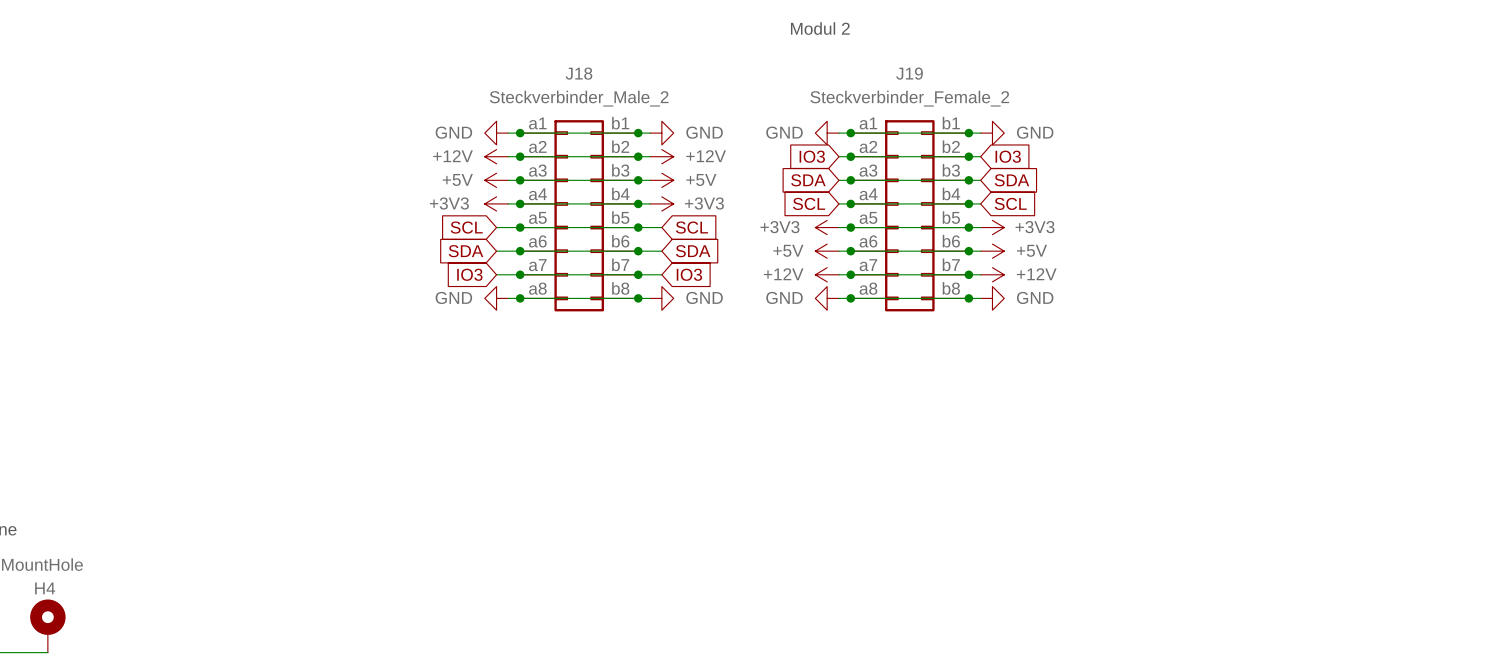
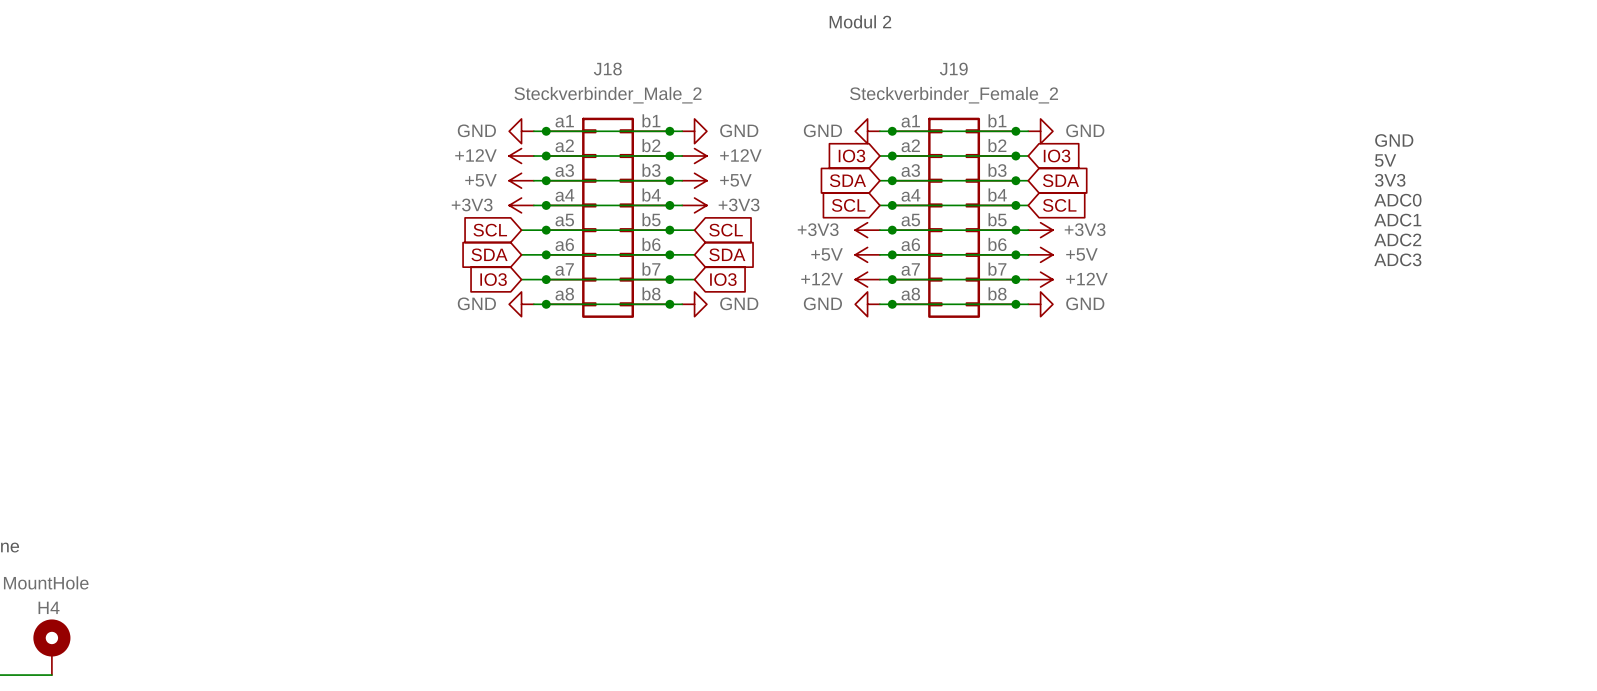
text: none -> GND (1394, 140)
text: none -> 5V (1385, 160)
text: none -> 3V3 (1390, 180)
text: none -> ADC0 (1397, 200)
text: none -> ADC1 (1397, 220)
text: none -> ADC2 (1397, 239)
text: none -> ADC3 (1397, 259)

